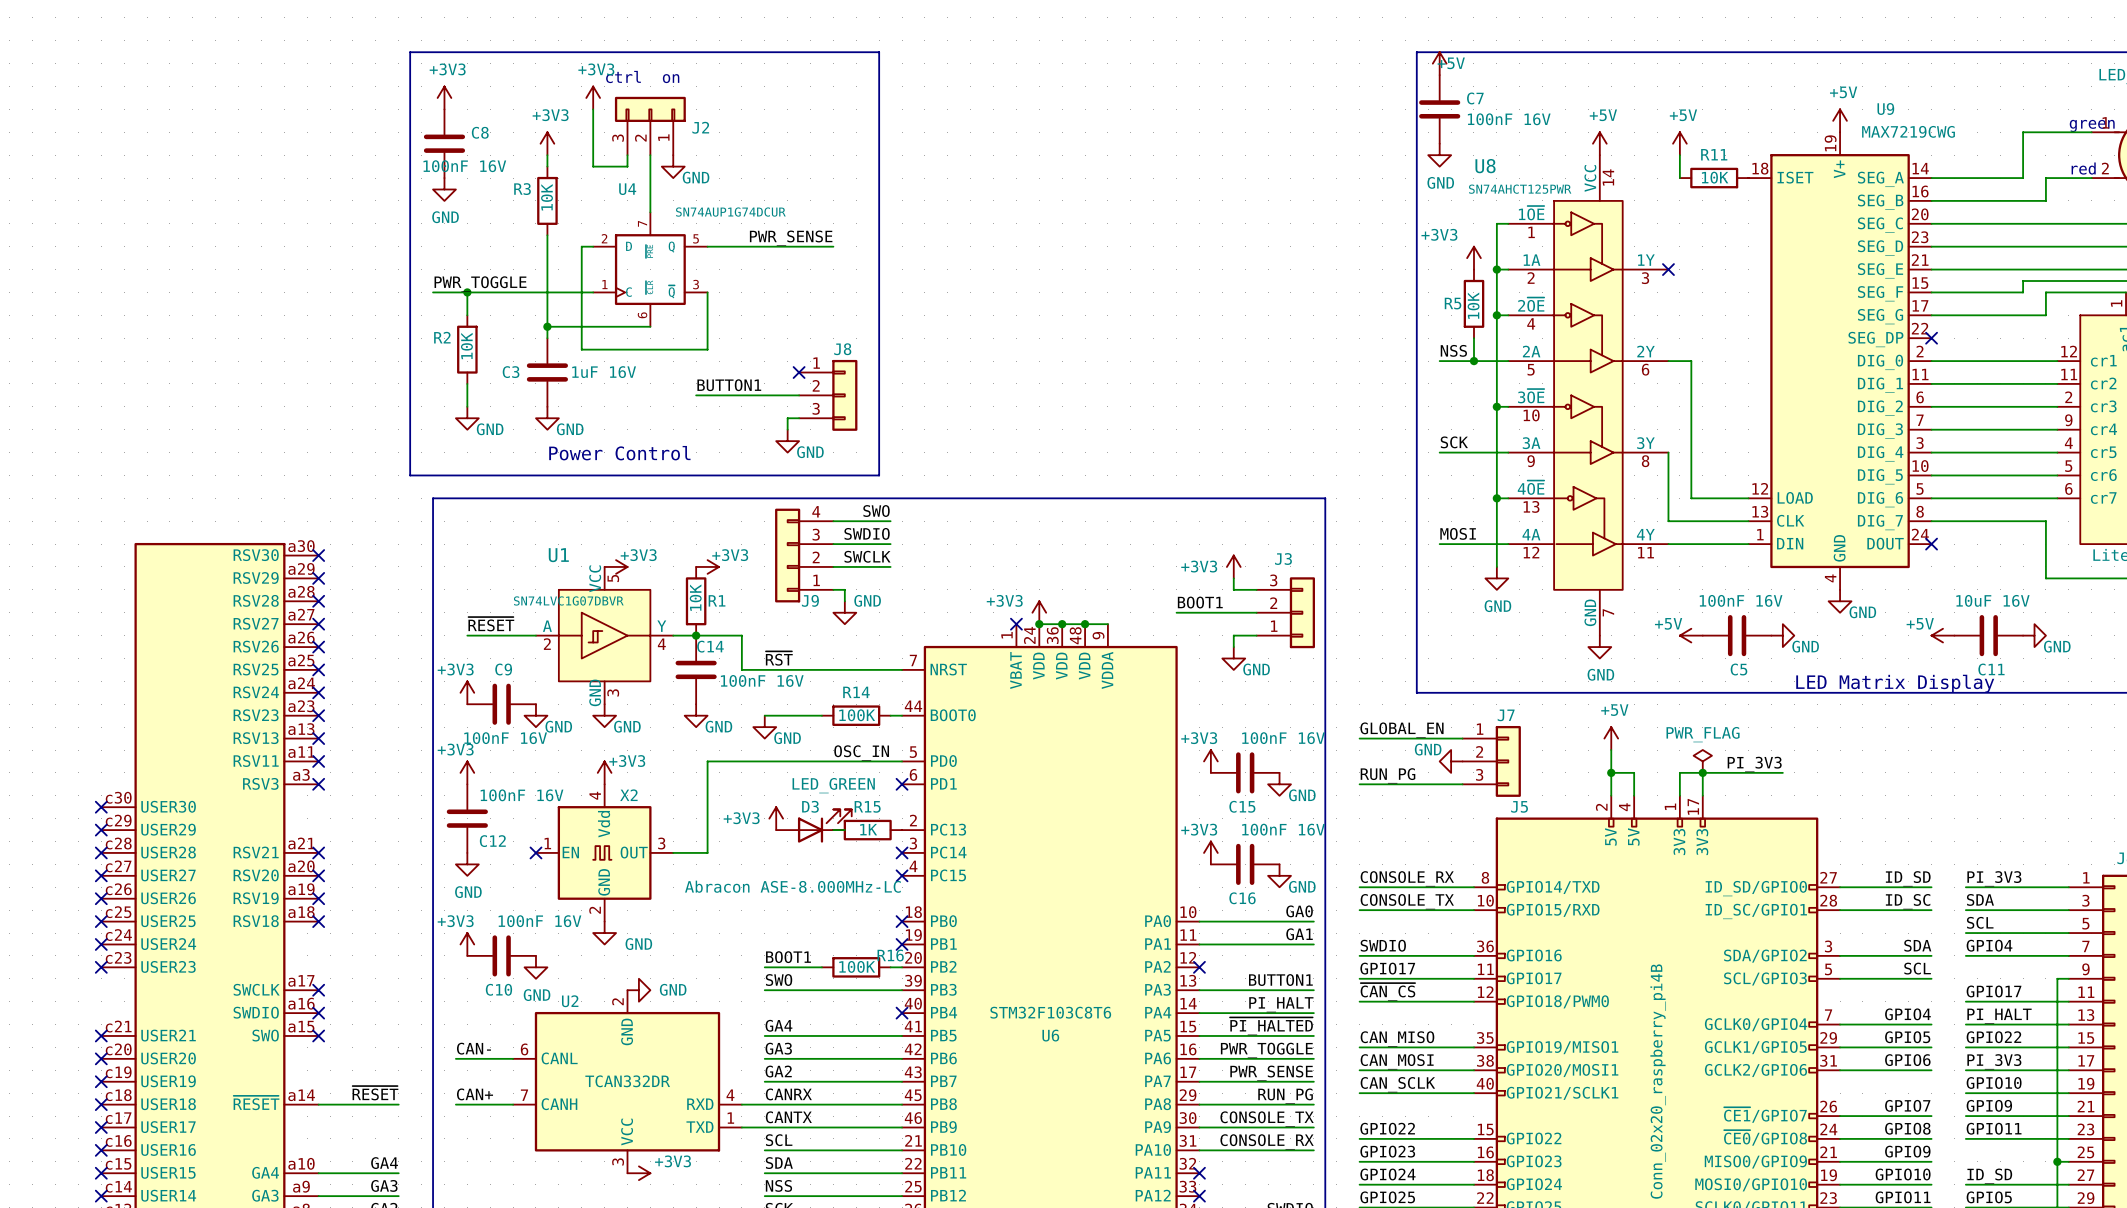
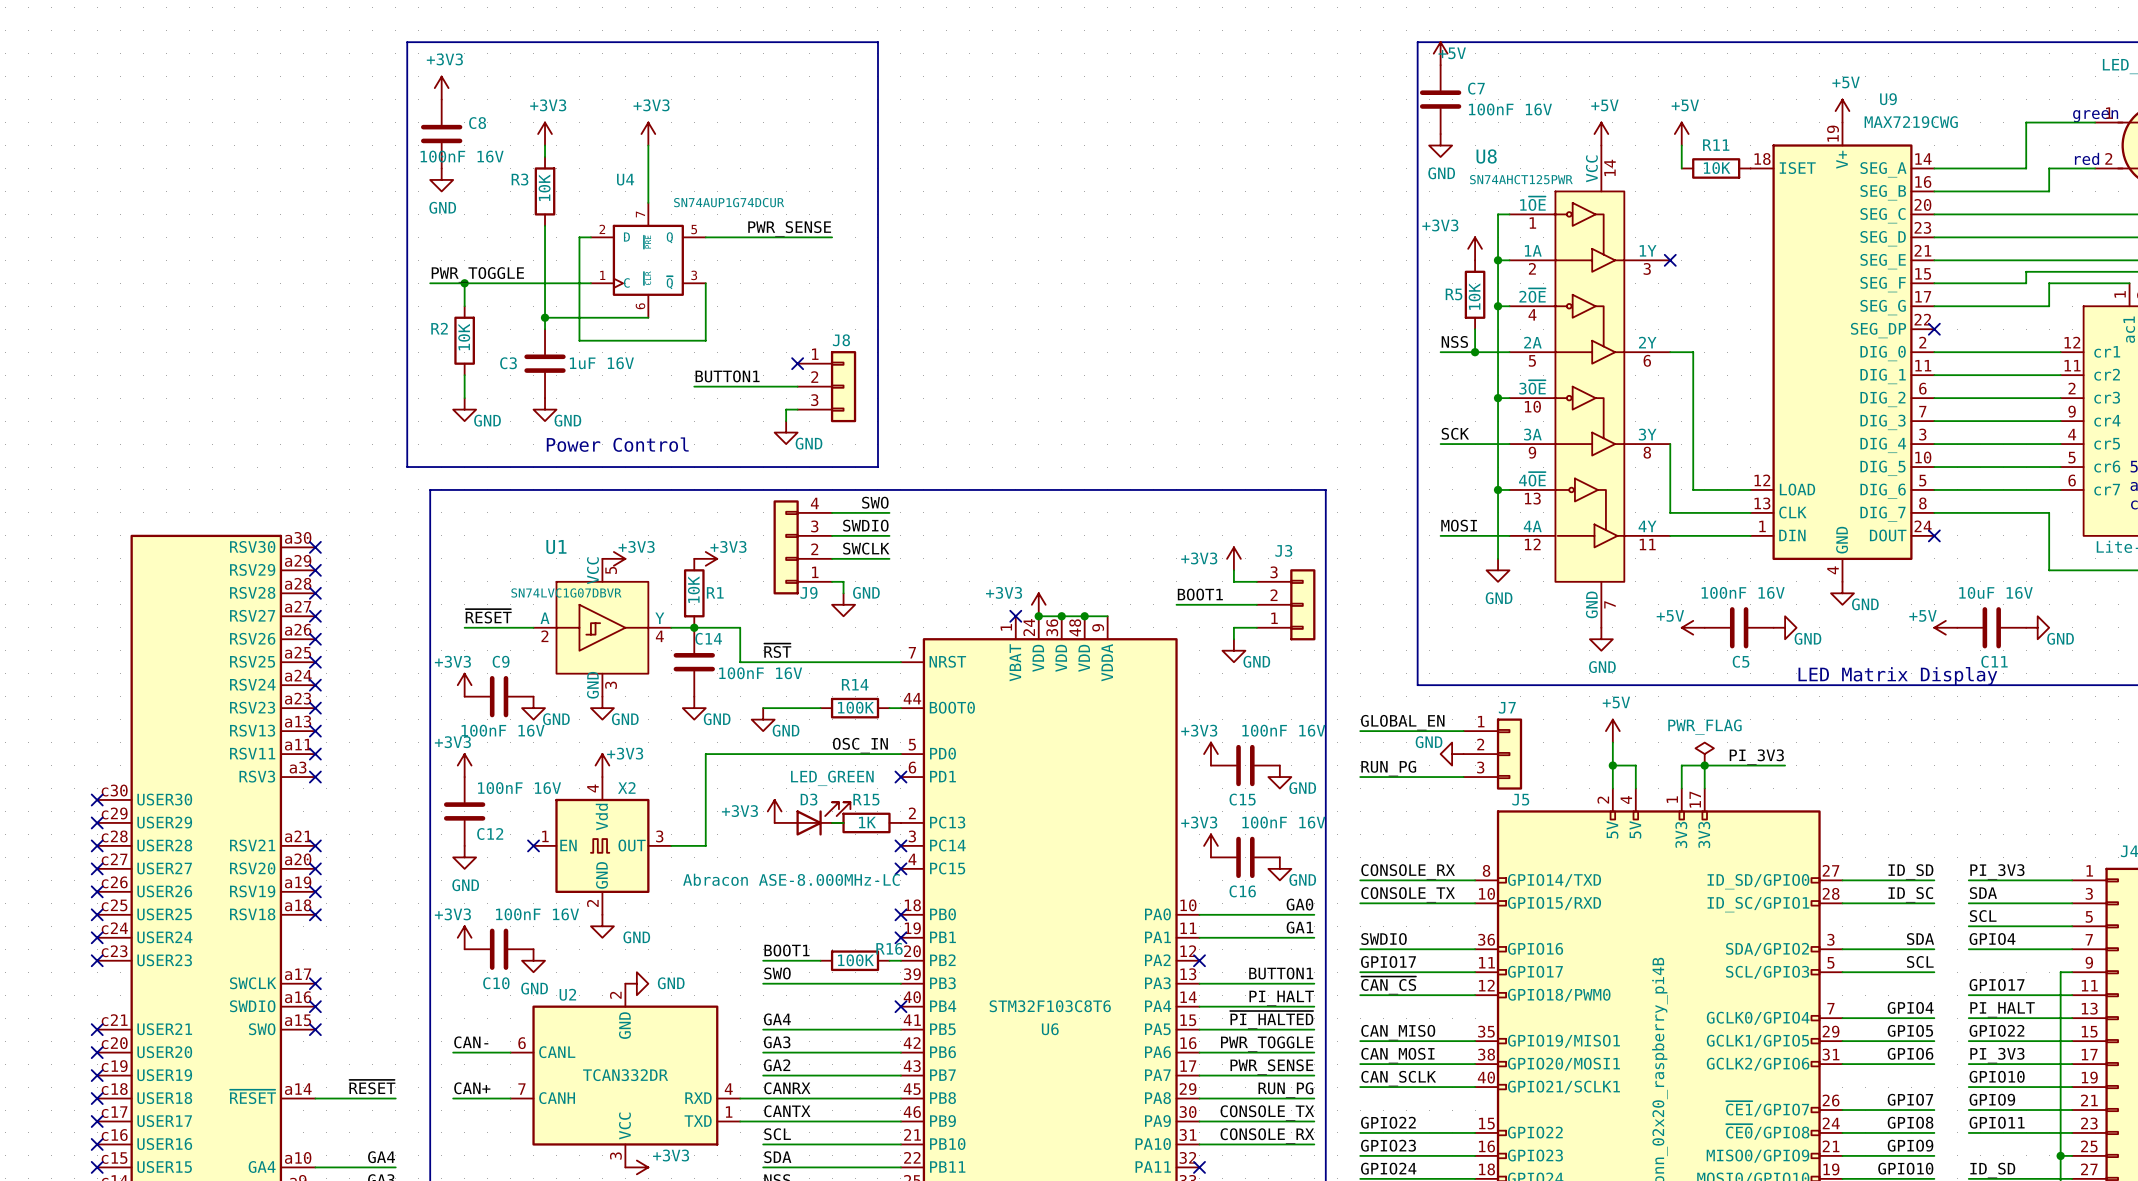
text: ctrl (623, 76) -> none
text: on (671, 78) -> none
power symbol position: +3V3 (593, 97) -> +3V3 (648, 134)
wire: (593, 109) (593, 166) (627, 166) (627, 155) -> none
J2: (650, 126) -> none
power symbol: GND (673, 166) -> none

